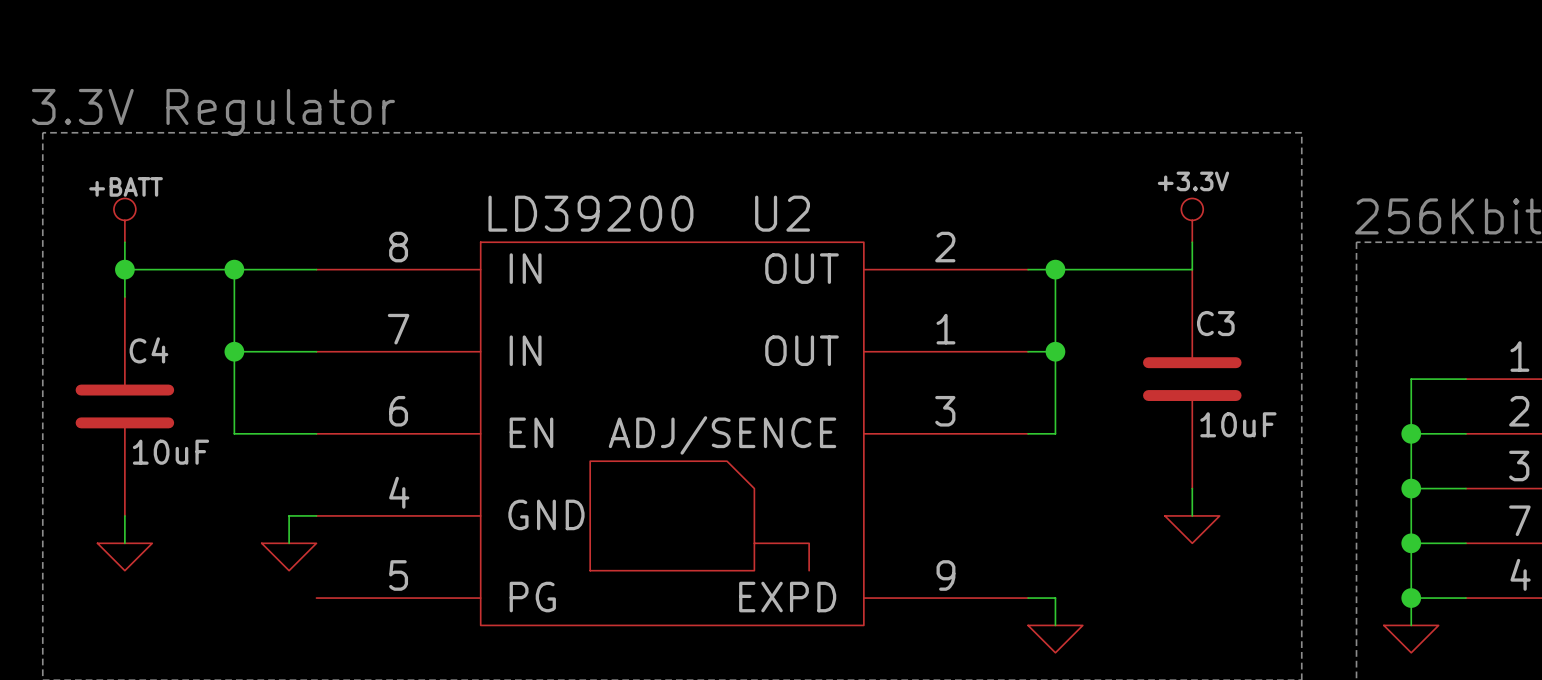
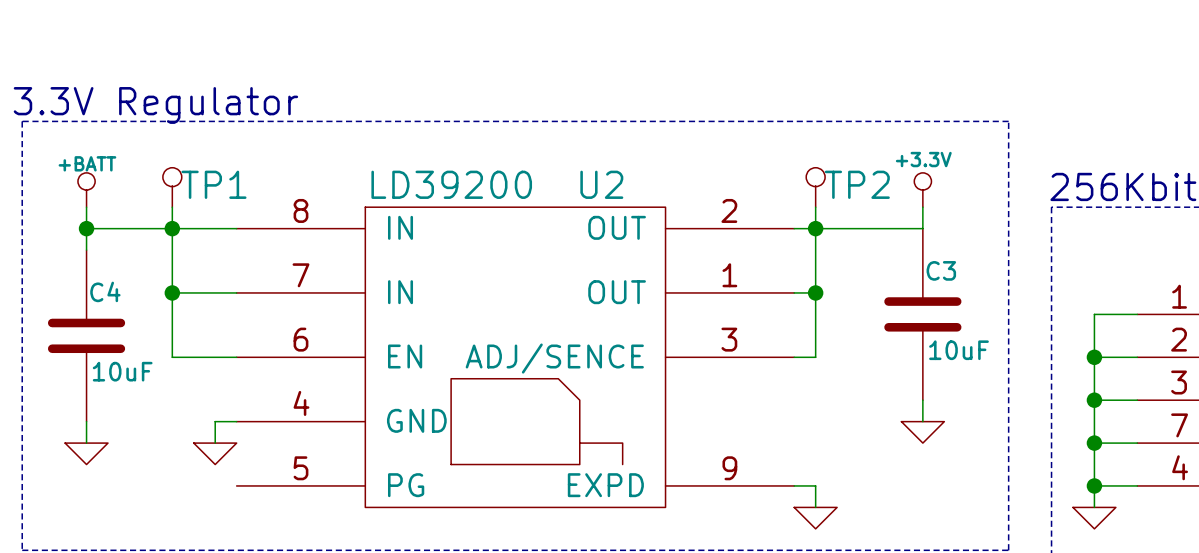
TP1: none -> (172, 187)
TP2: none -> (815, 187)
wire: none -> (172, 207) (172, 228)
wire: none -> (815, 207) (815, 228)

